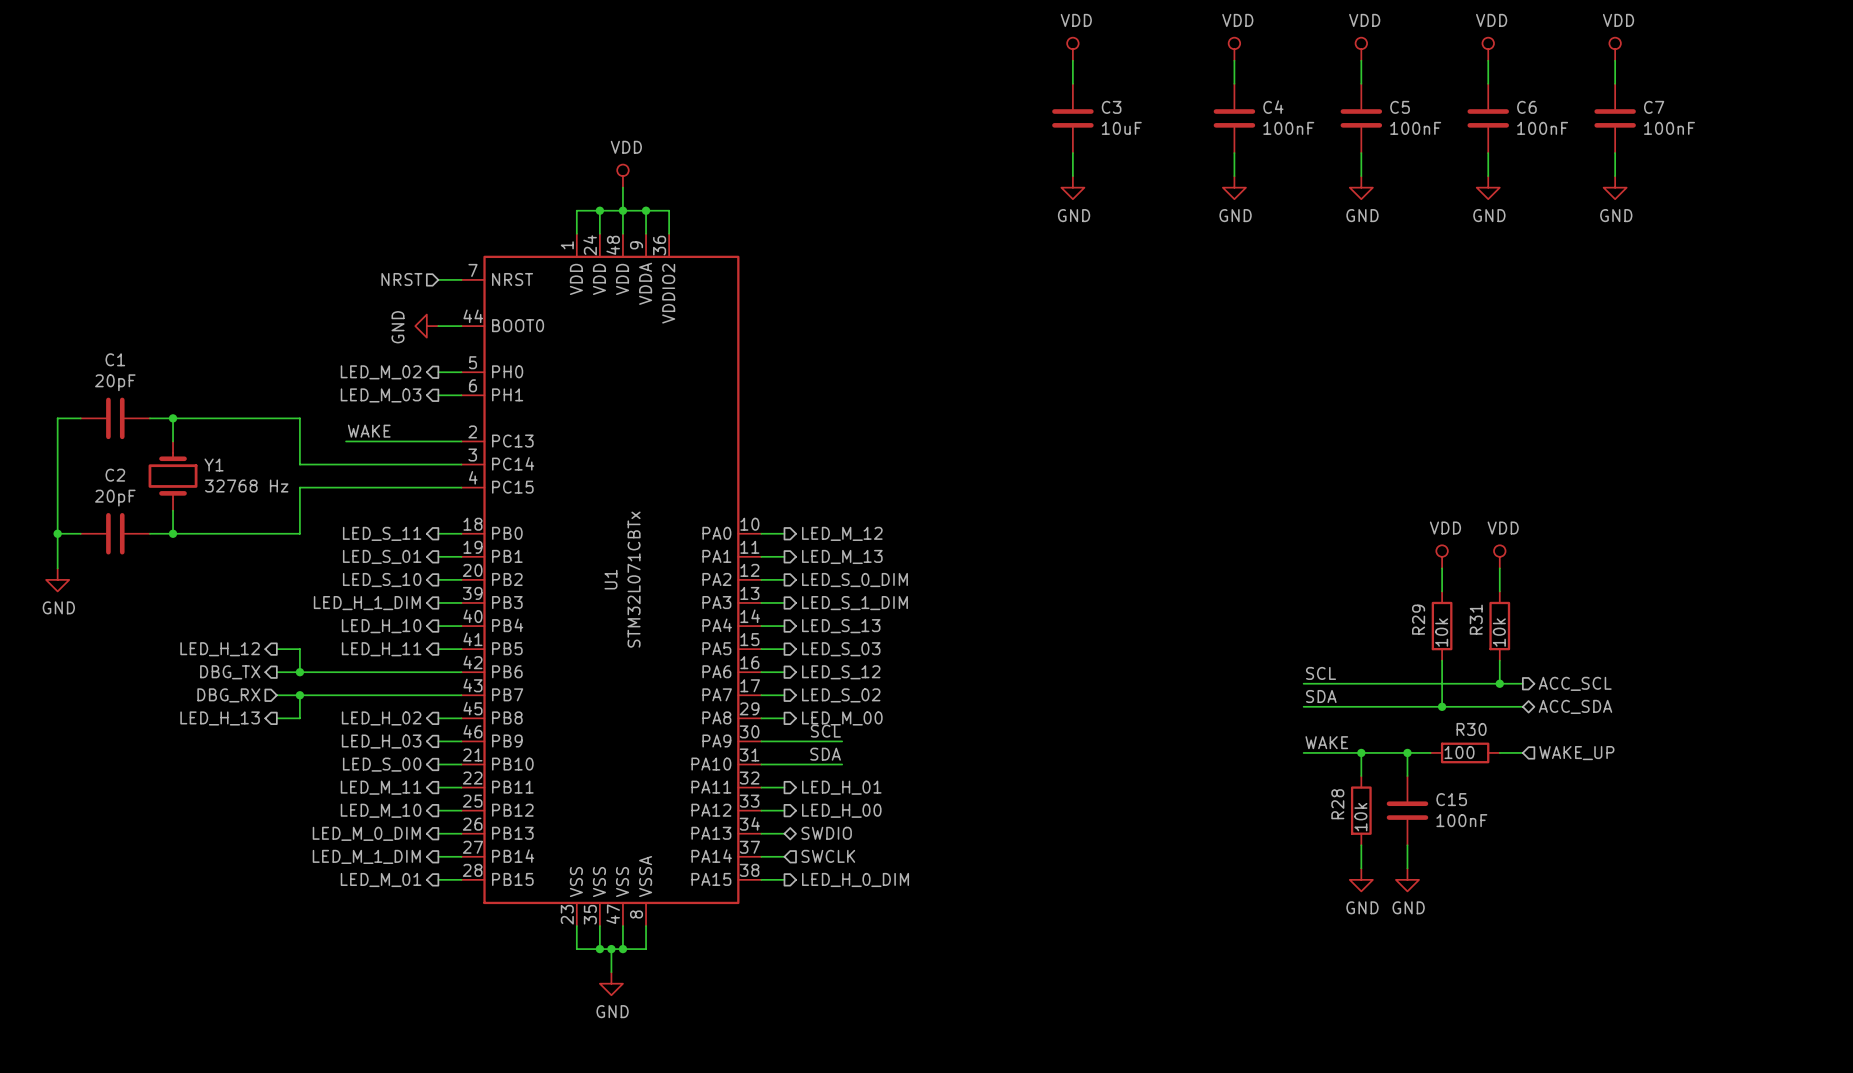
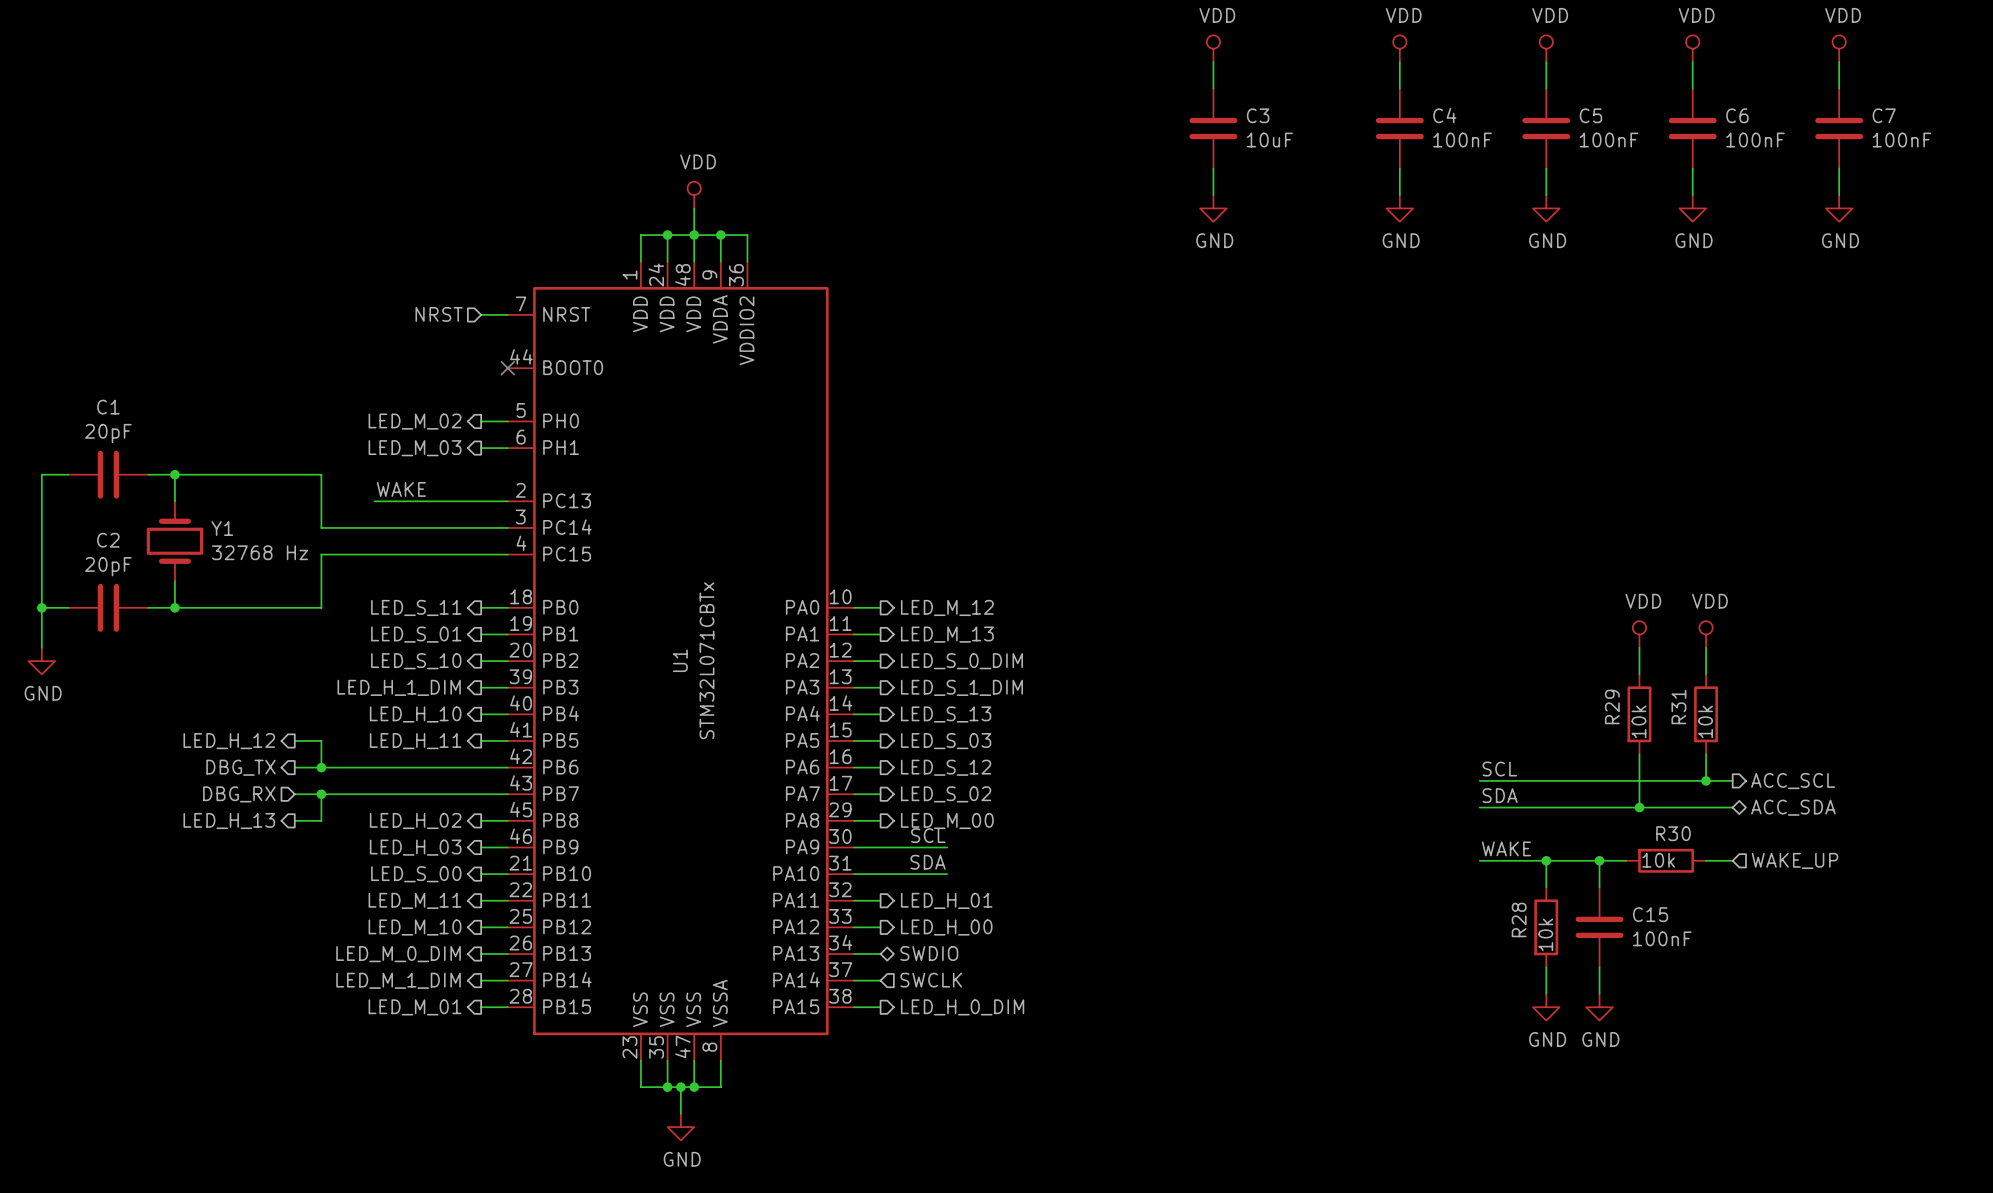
power symbol: GND (426, 326) -> none
wire: (438, 326) (461, 326) -> none
no-connect mark: none -> (507, 368)
R30 value: 100 (1459, 752) -> 10k (1658, 860)

